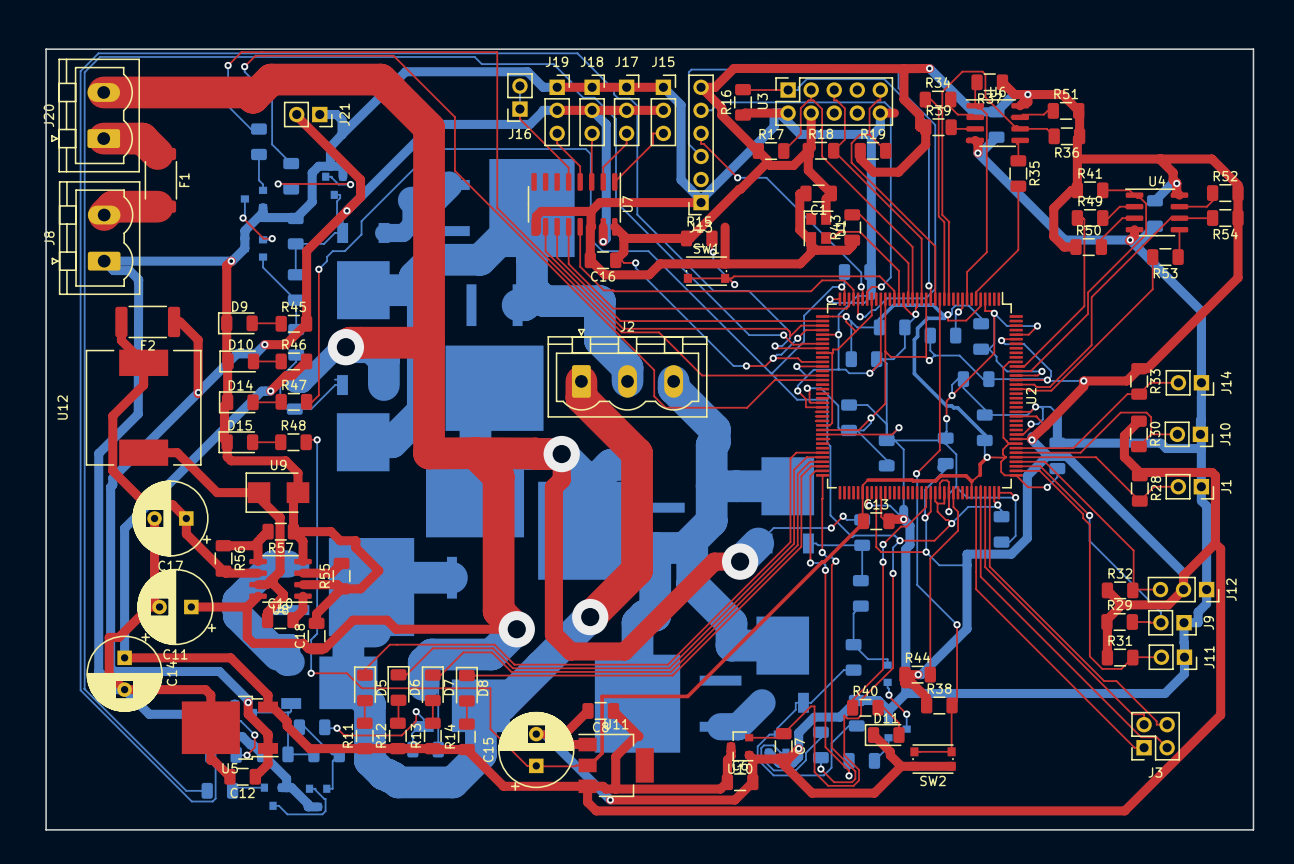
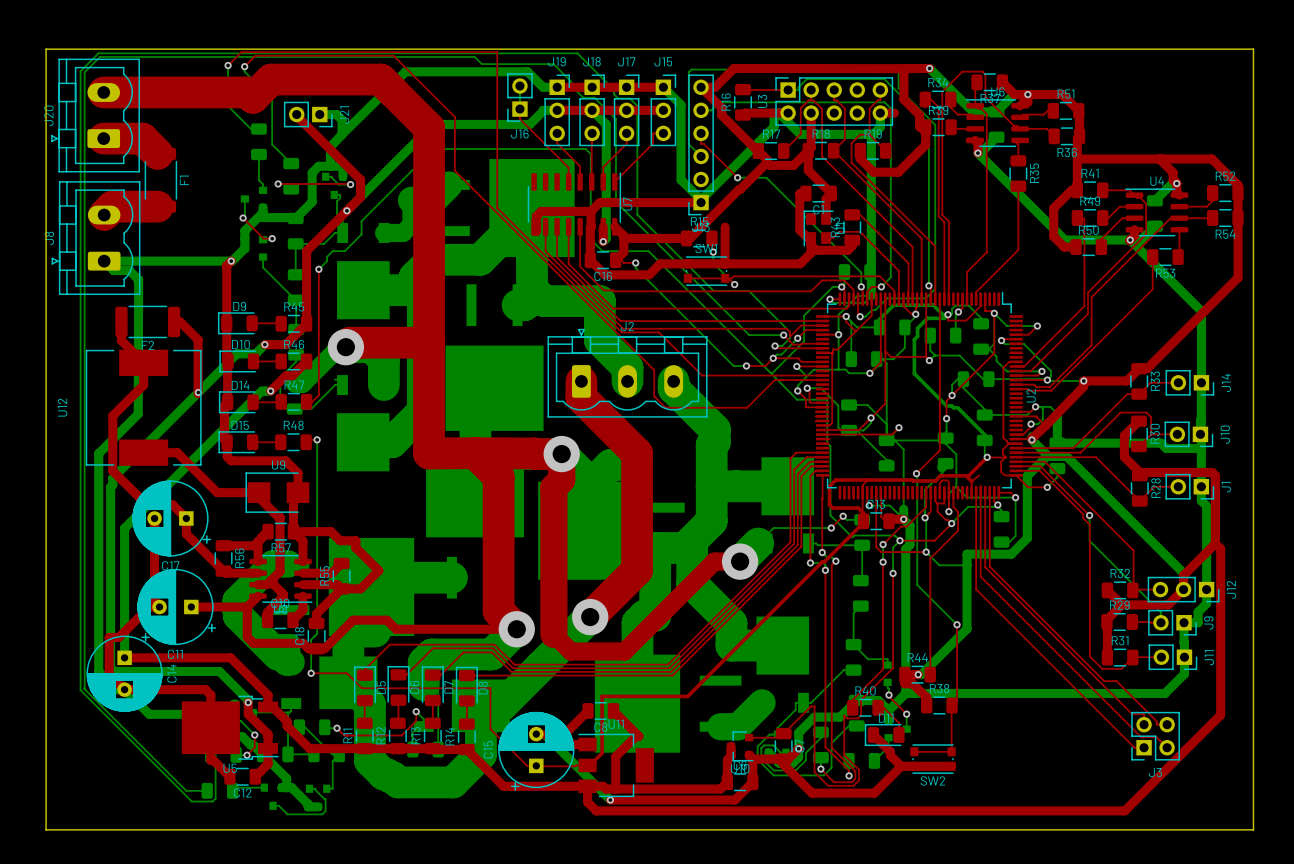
top track width: thin (561, 454) (561, 479) (553, 487) (553, 634) -> thick (561, 454) (561, 479) (553, 487) (553, 634)
top track: (980, 464) (979, 475) -> (980, 464) (968, 475) (966, 475)
top track: none -> (867, 480) (835, 480) (829, 486) (829, 504) (832, 508) (858, 508) (863, 513) (863, 521)

